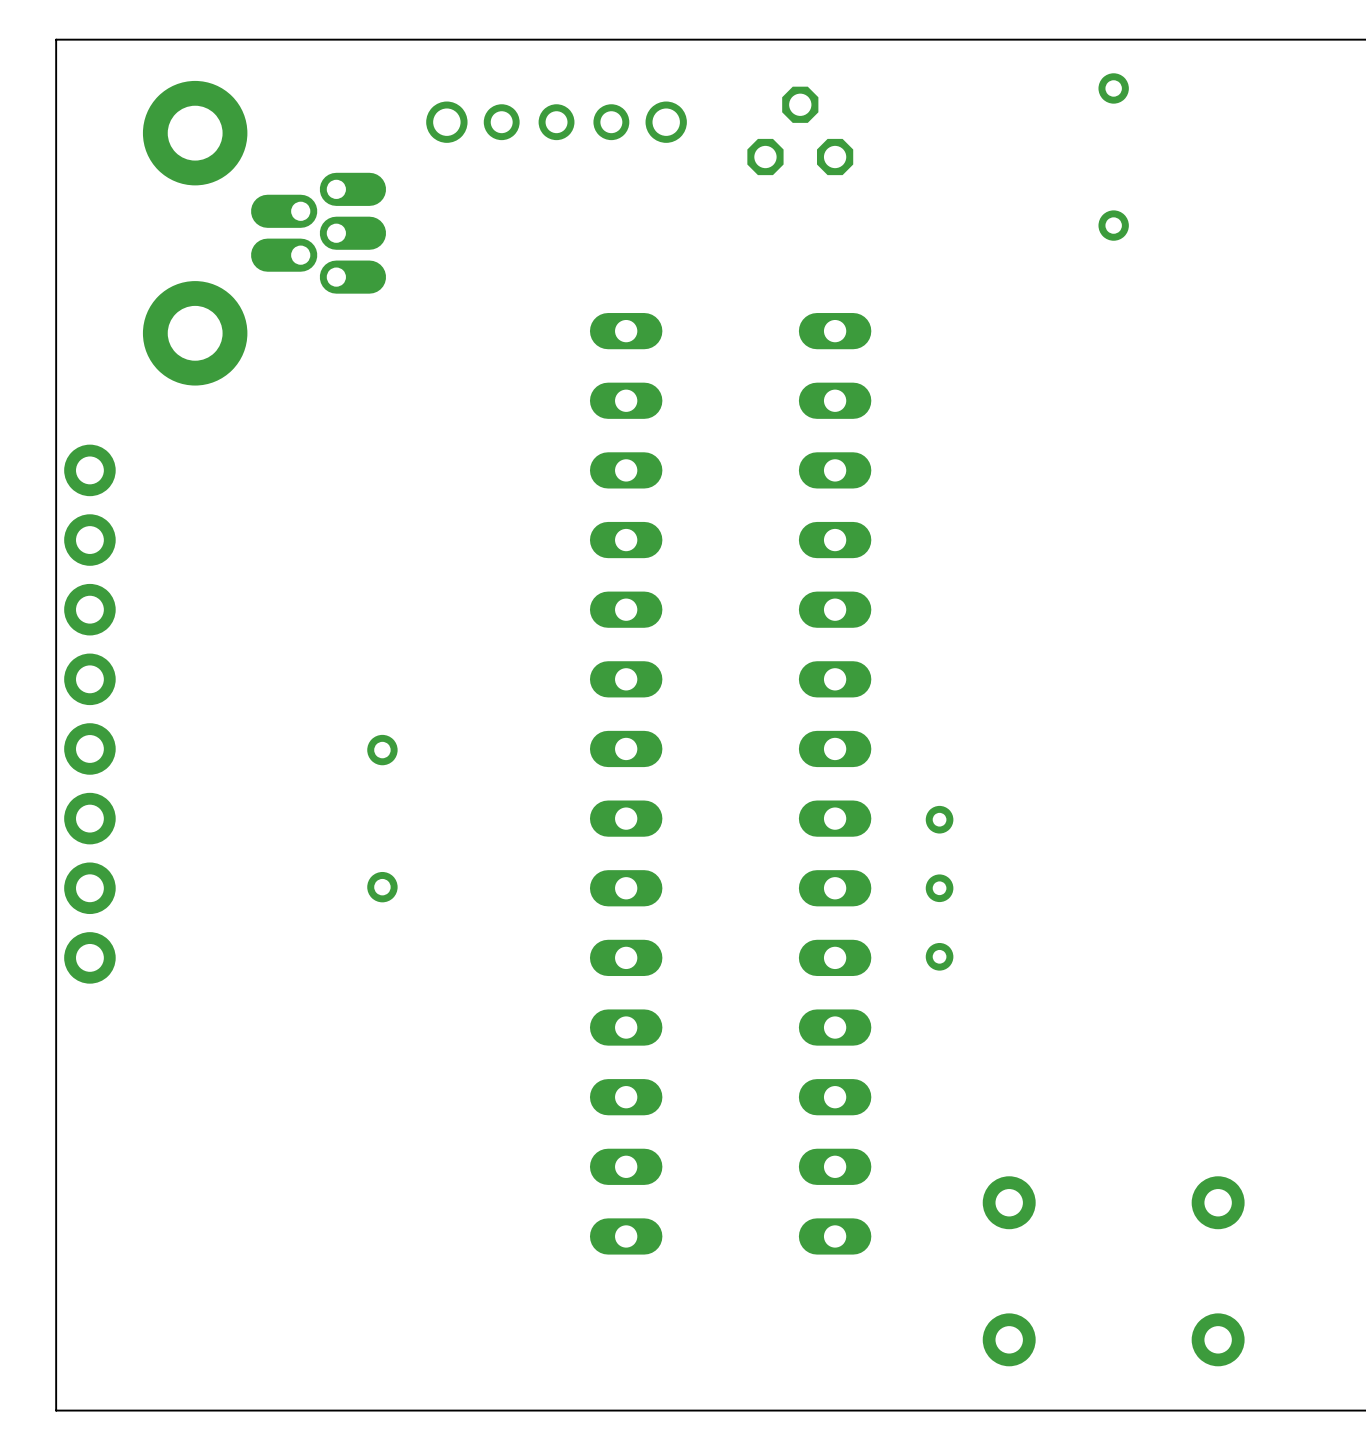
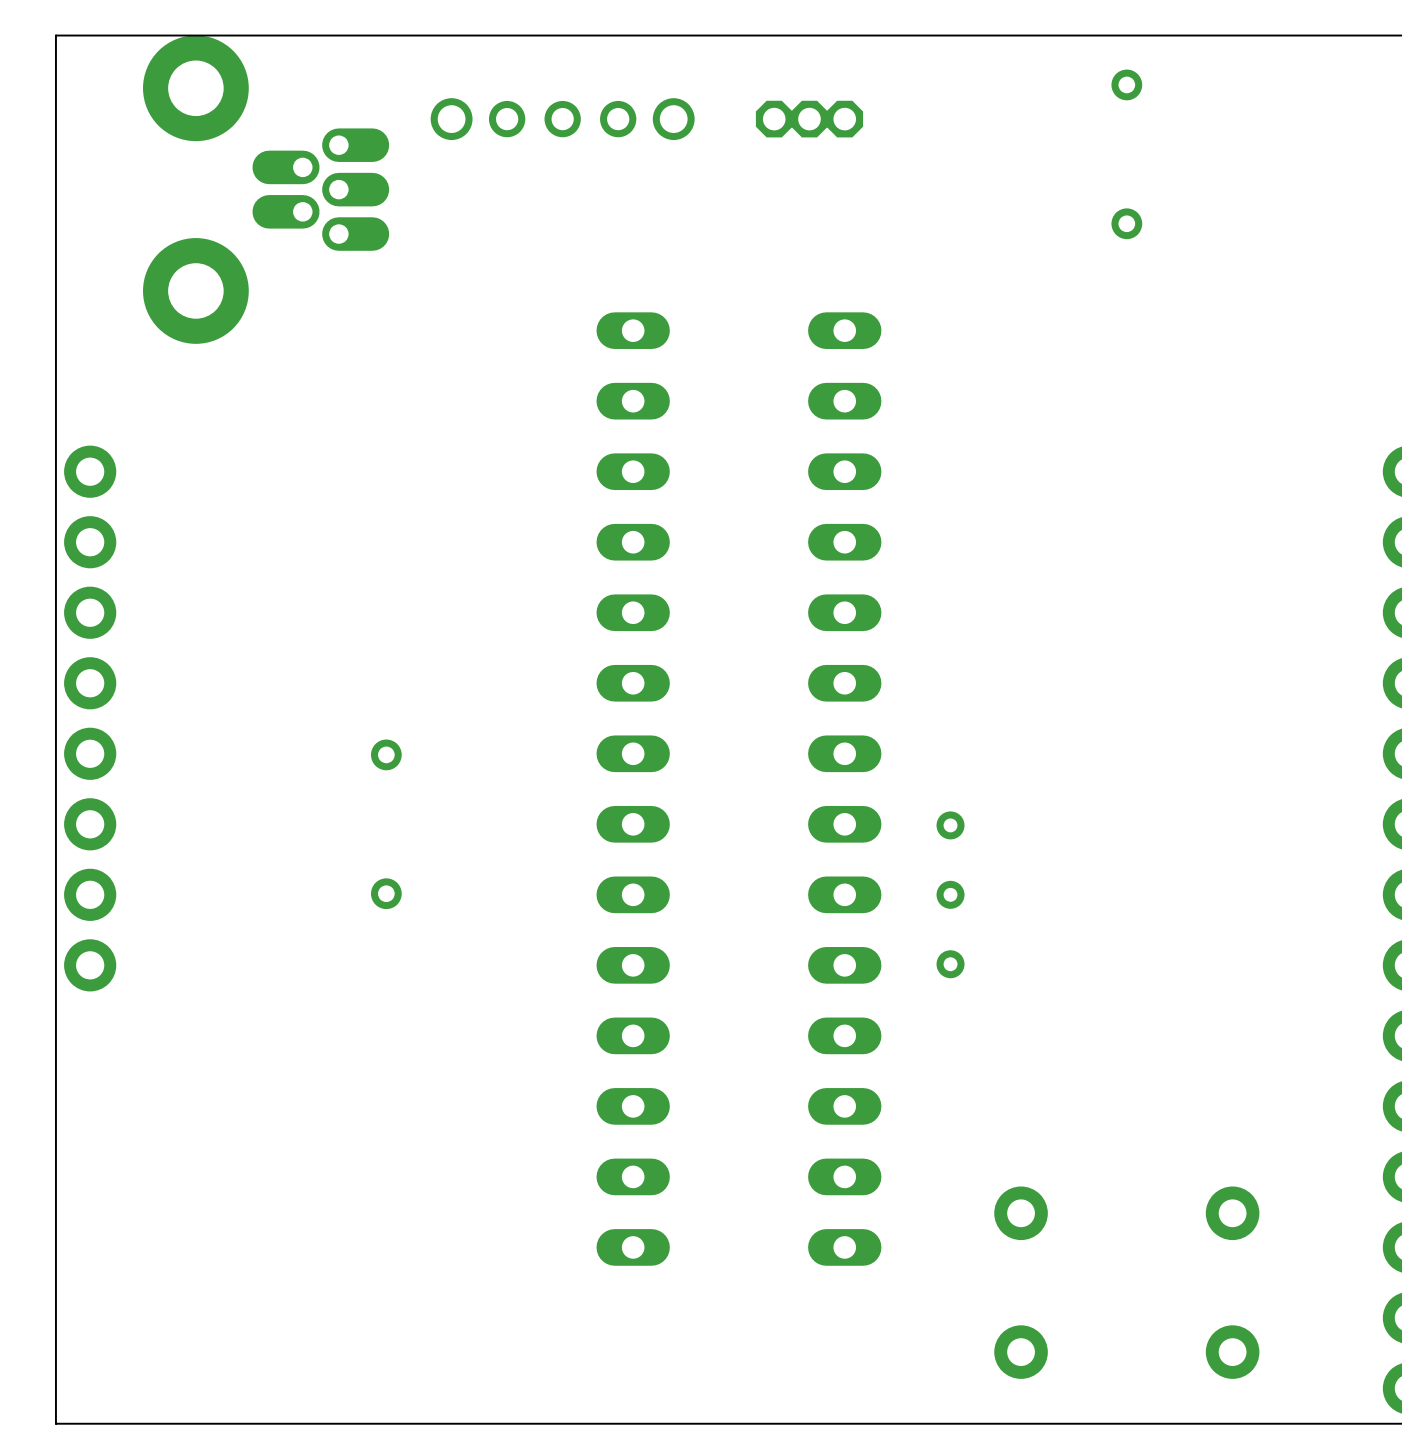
part footprint: [747, 86, 854, 176] -> [755, 100, 864, 138]
part position: (264, 233) -> (266, 189)

